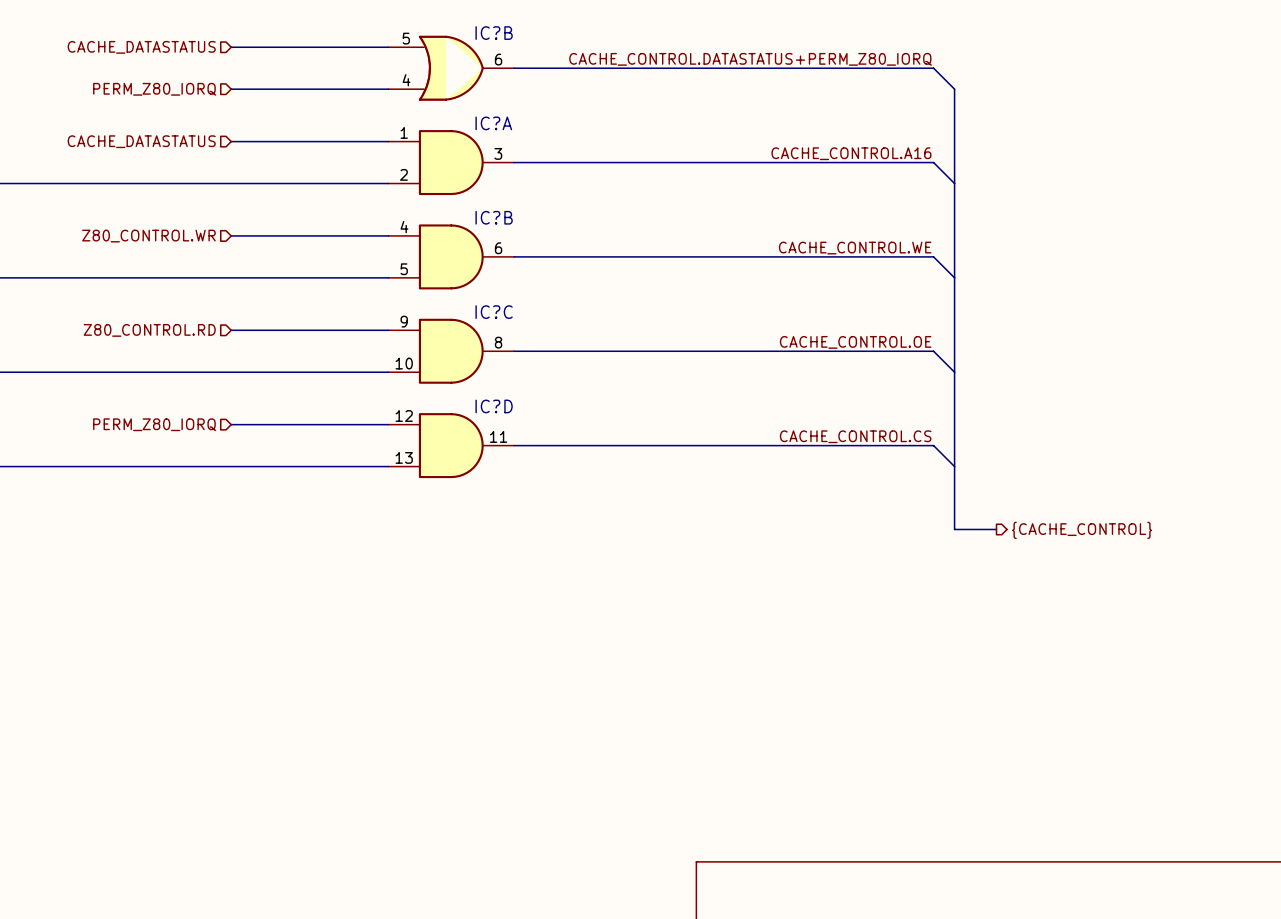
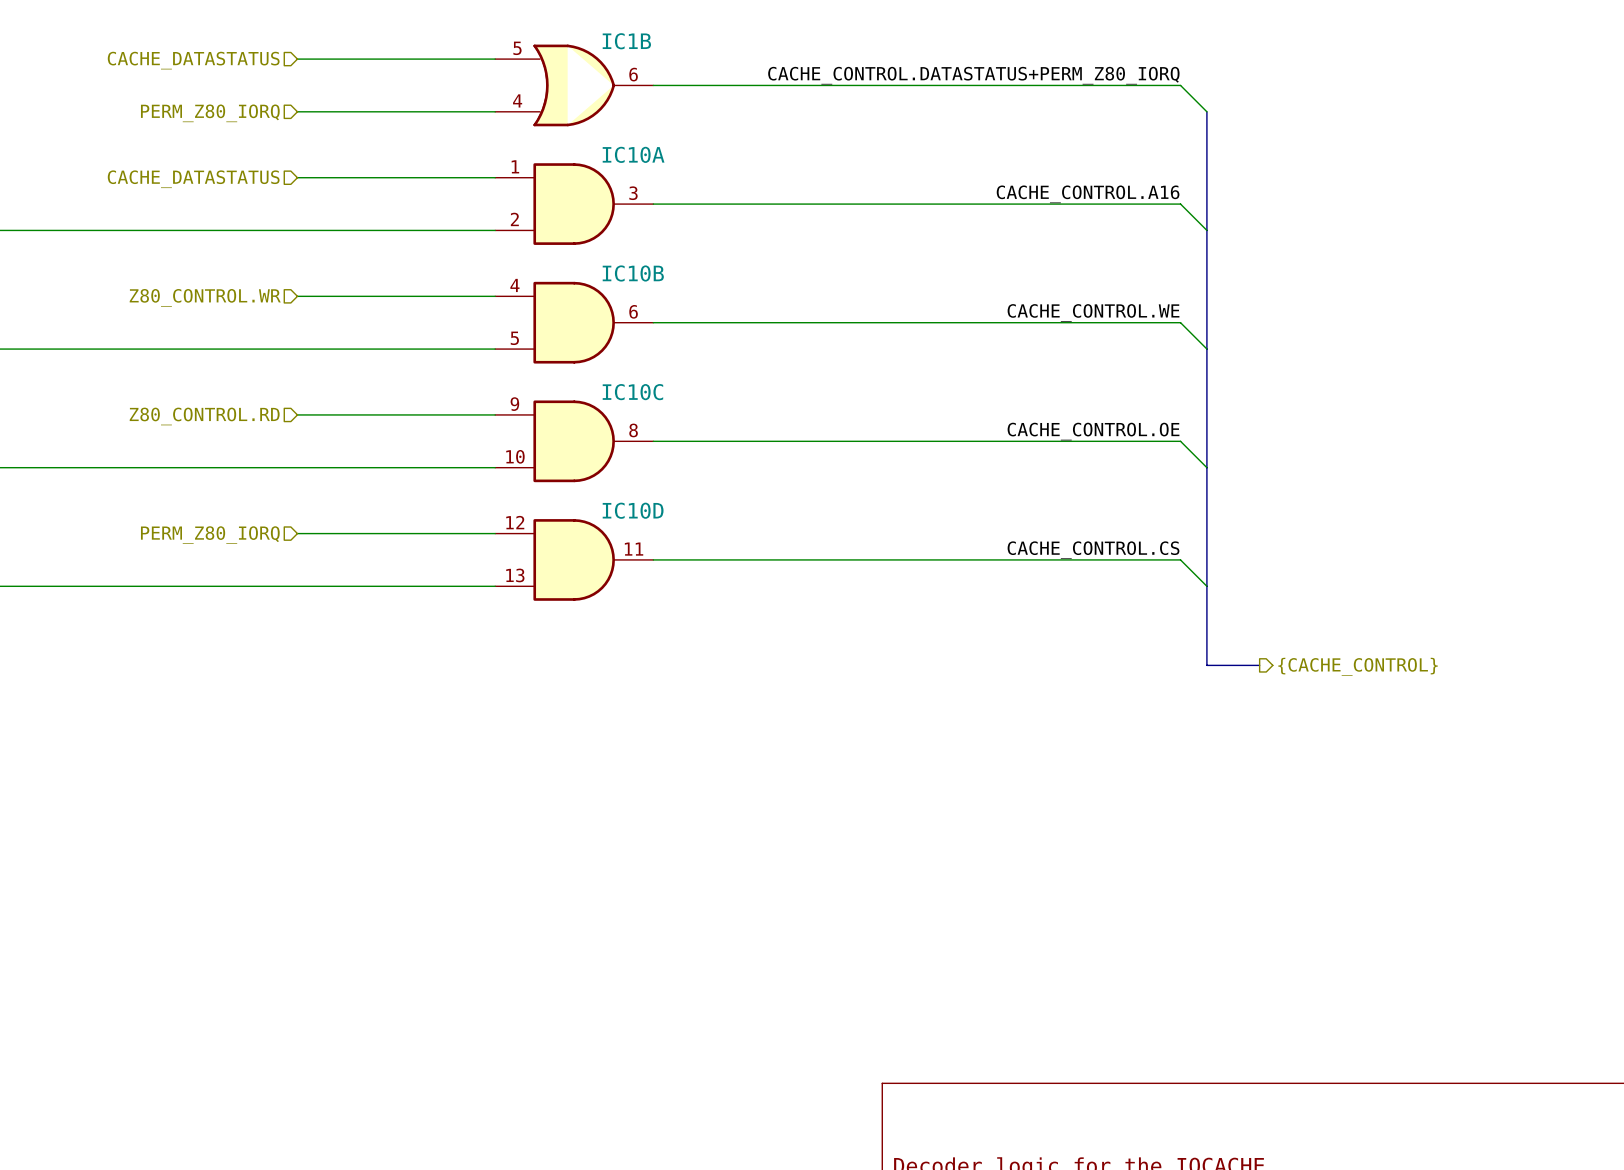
IC?B name: IC?B (494, 33) -> IC1B (626, 41)
IC?A name: IC?A (493, 123) -> IC10A (633, 154)
IC?B name: IC?B (494, 217) -> IC10B (633, 273)
IC?C name: IC?C (494, 312) -> IC10C (632, 392)
IC?D name: IC?D (494, 406) -> IC10D (633, 510)

